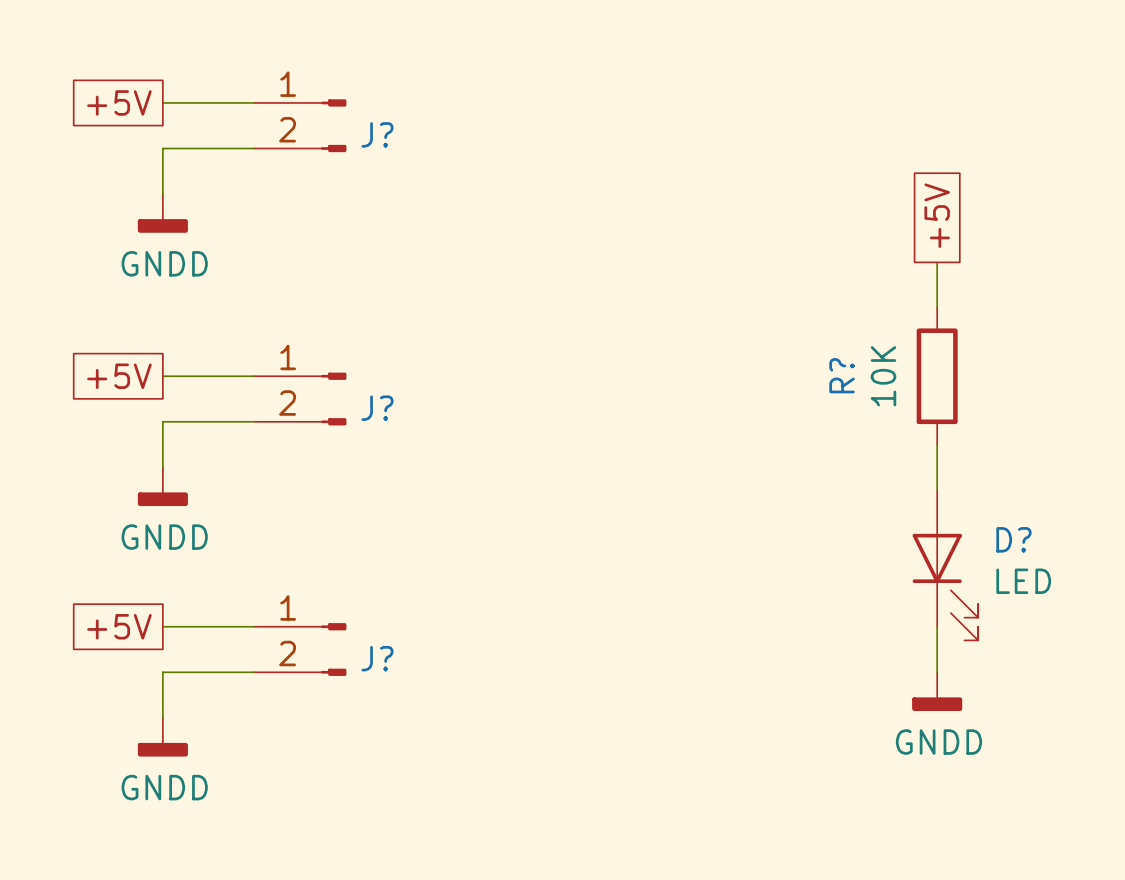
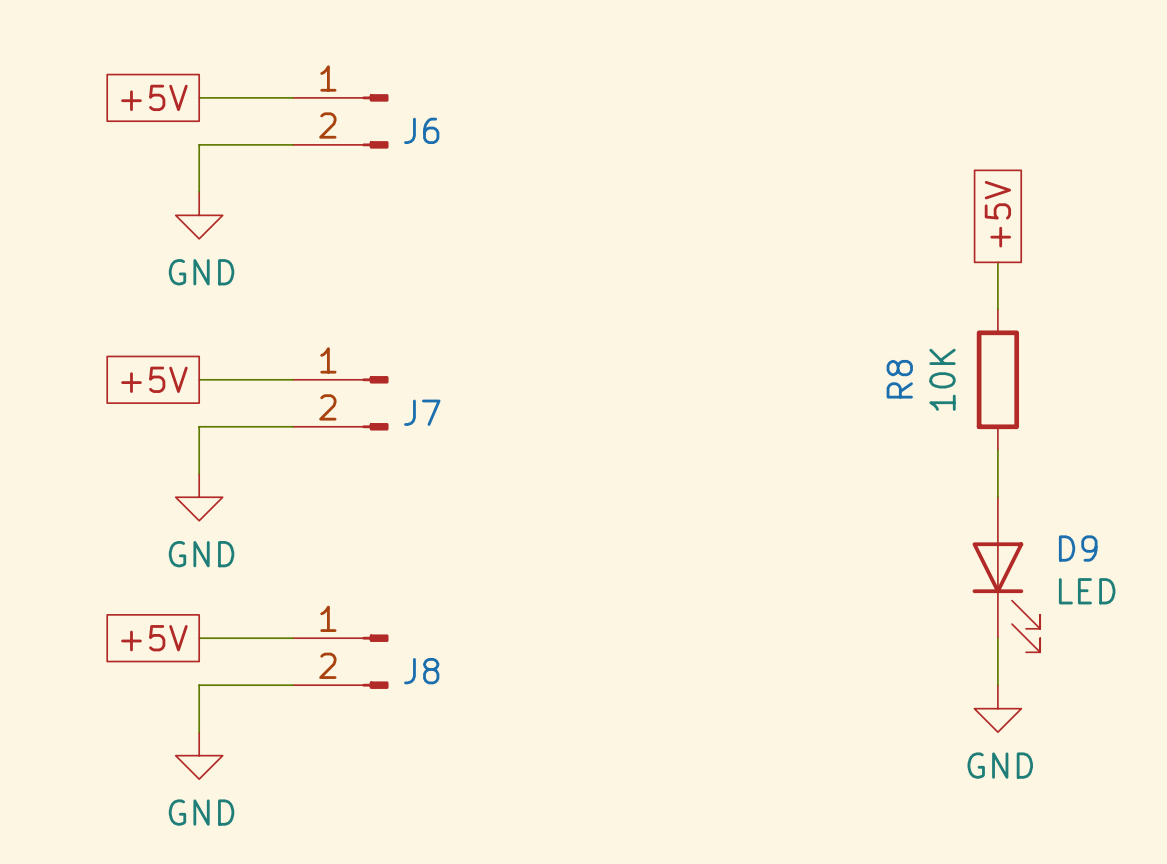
J? name: J? (377, 134) -> J6 (421, 130)
power symbol: GNDD (162, 213) -> GND (199, 215)
R? name: R? (842, 375) -> R8 (899, 379)
J? name: J? (377, 408) -> J7 (422, 412)
power symbol: GNDD (162, 486) -> GND (199, 497)
D? name: D? (1013, 539) -> D9 (1078, 548)
J? name: J? (377, 658) -> J8 (421, 671)
power symbol: GNDD (937, 691) -> GND (997, 708)
power symbol: GNDD (162, 737) -> GND (199, 755)

